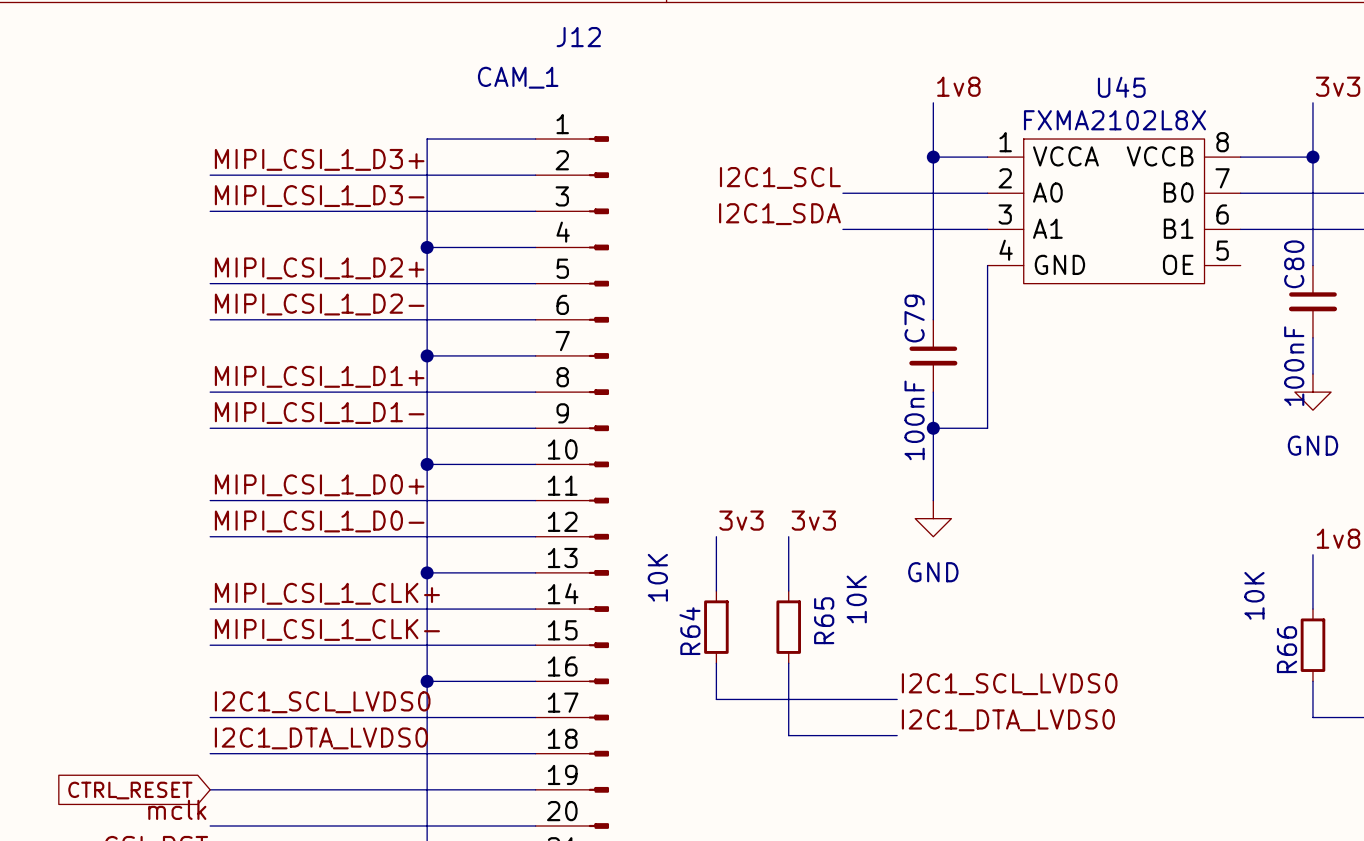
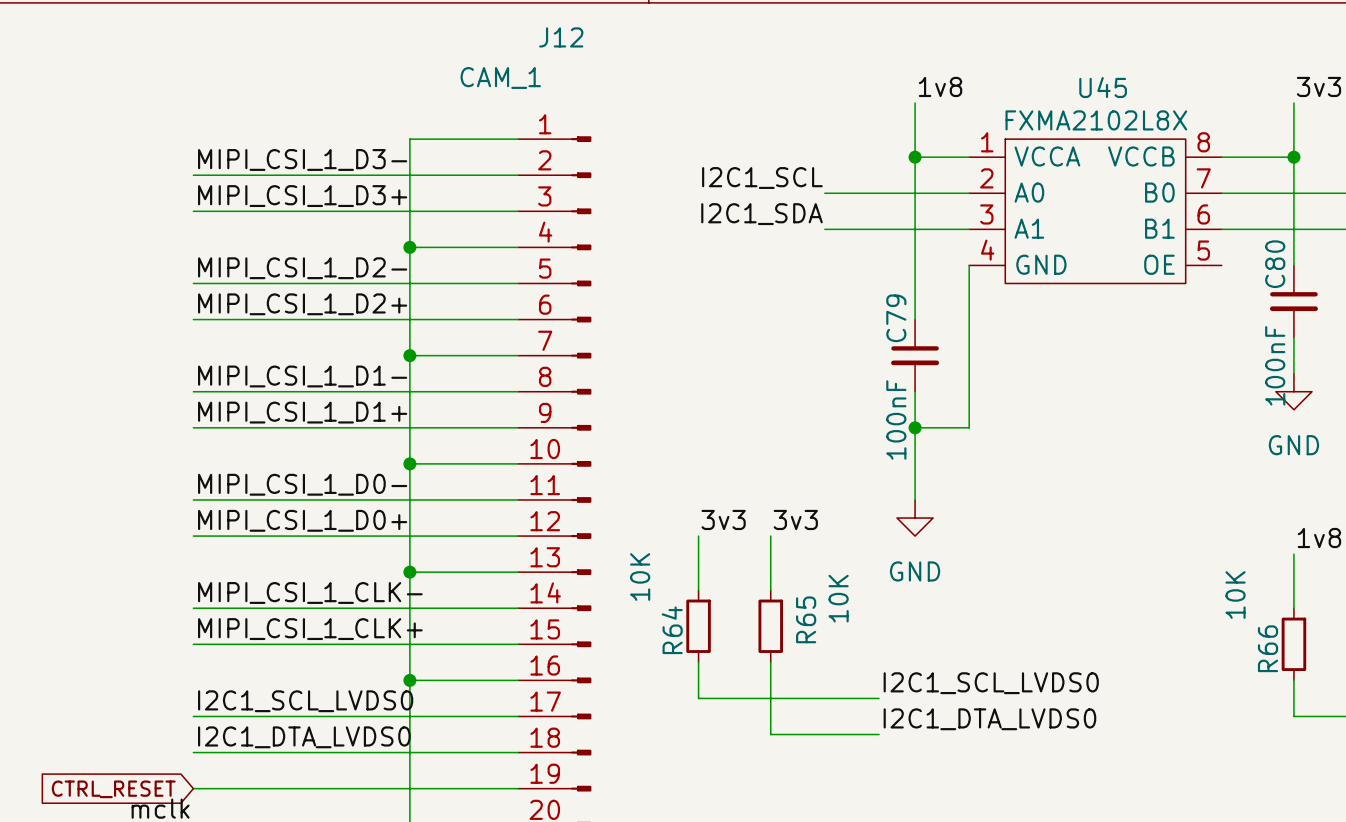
label: MIPI_CSI_1_D3+ (319, 159) -> MIPI_CSI_1_D3- (302, 159)
label: MIPI_CSI_1_D3- (319, 196) -> MIPI_CSI_1_D3+ (302, 196)
label: MIPI_CSI_1_D2+ (319, 268) -> MIPI_CSI_1_D2- (302, 268)
label: MIPI_CSI_1_D2- (319, 304) -> MIPI_CSI_1_D2+ (302, 304)
label: MIPI_CSI_1_D1+ (319, 376) -> MIPI_CSI_1_D1- (302, 376)
label: MIPI_CSI_1_D1- (319, 412) -> MIPI_CSI_1_D1+ (302, 412)
label: MIPI_CSI_1_D0+ (319, 485) -> MIPI_CSI_1_D0- (302, 484)
label: MIPI_CSI_1_D0- (319, 521) -> MIPI_CSI_1_D0+ (302, 520)
label: MIPI_CSI_1_CLK+ (327, 593) -> MIPI_CSI_1_CLK- (310, 592)
label: MIPI_CSI_1_CLK- (327, 629) -> MIPI_CSI_1_CLK+ (310, 629)

